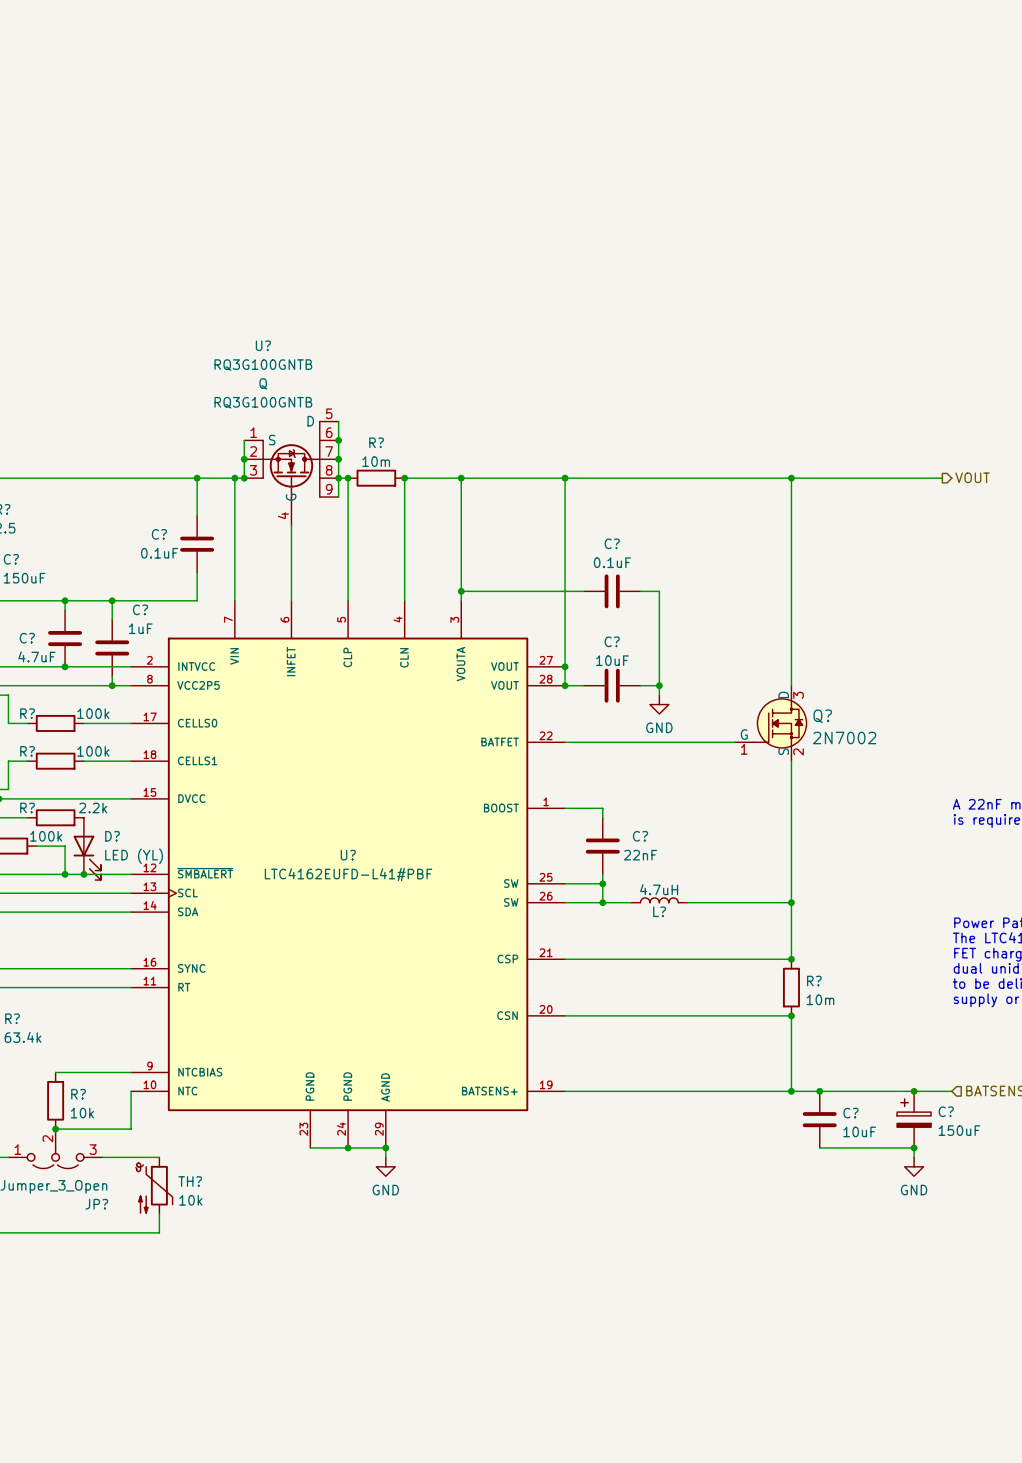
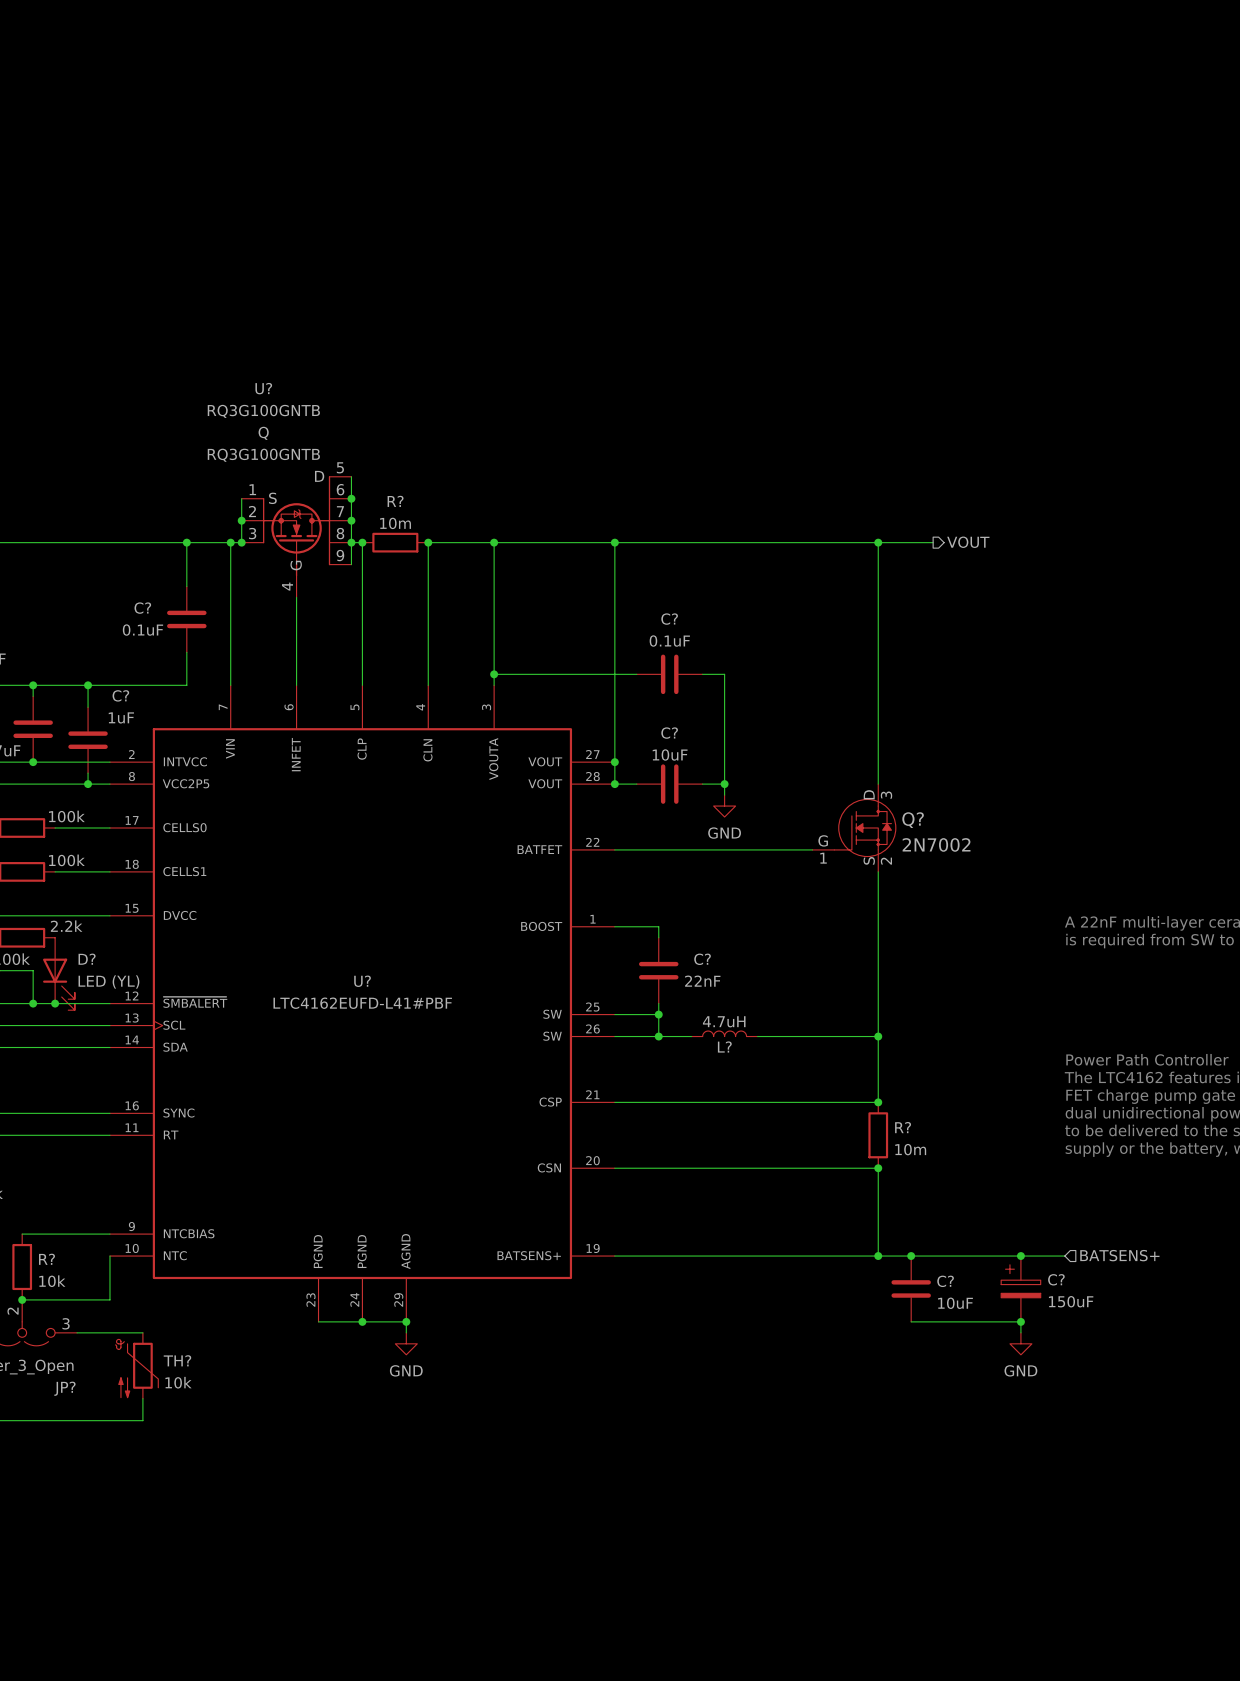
hierarchical label position: VOUT (972, 477) -> VOUT (968, 542)
wire: (838, 478) (942, 478) -> none

